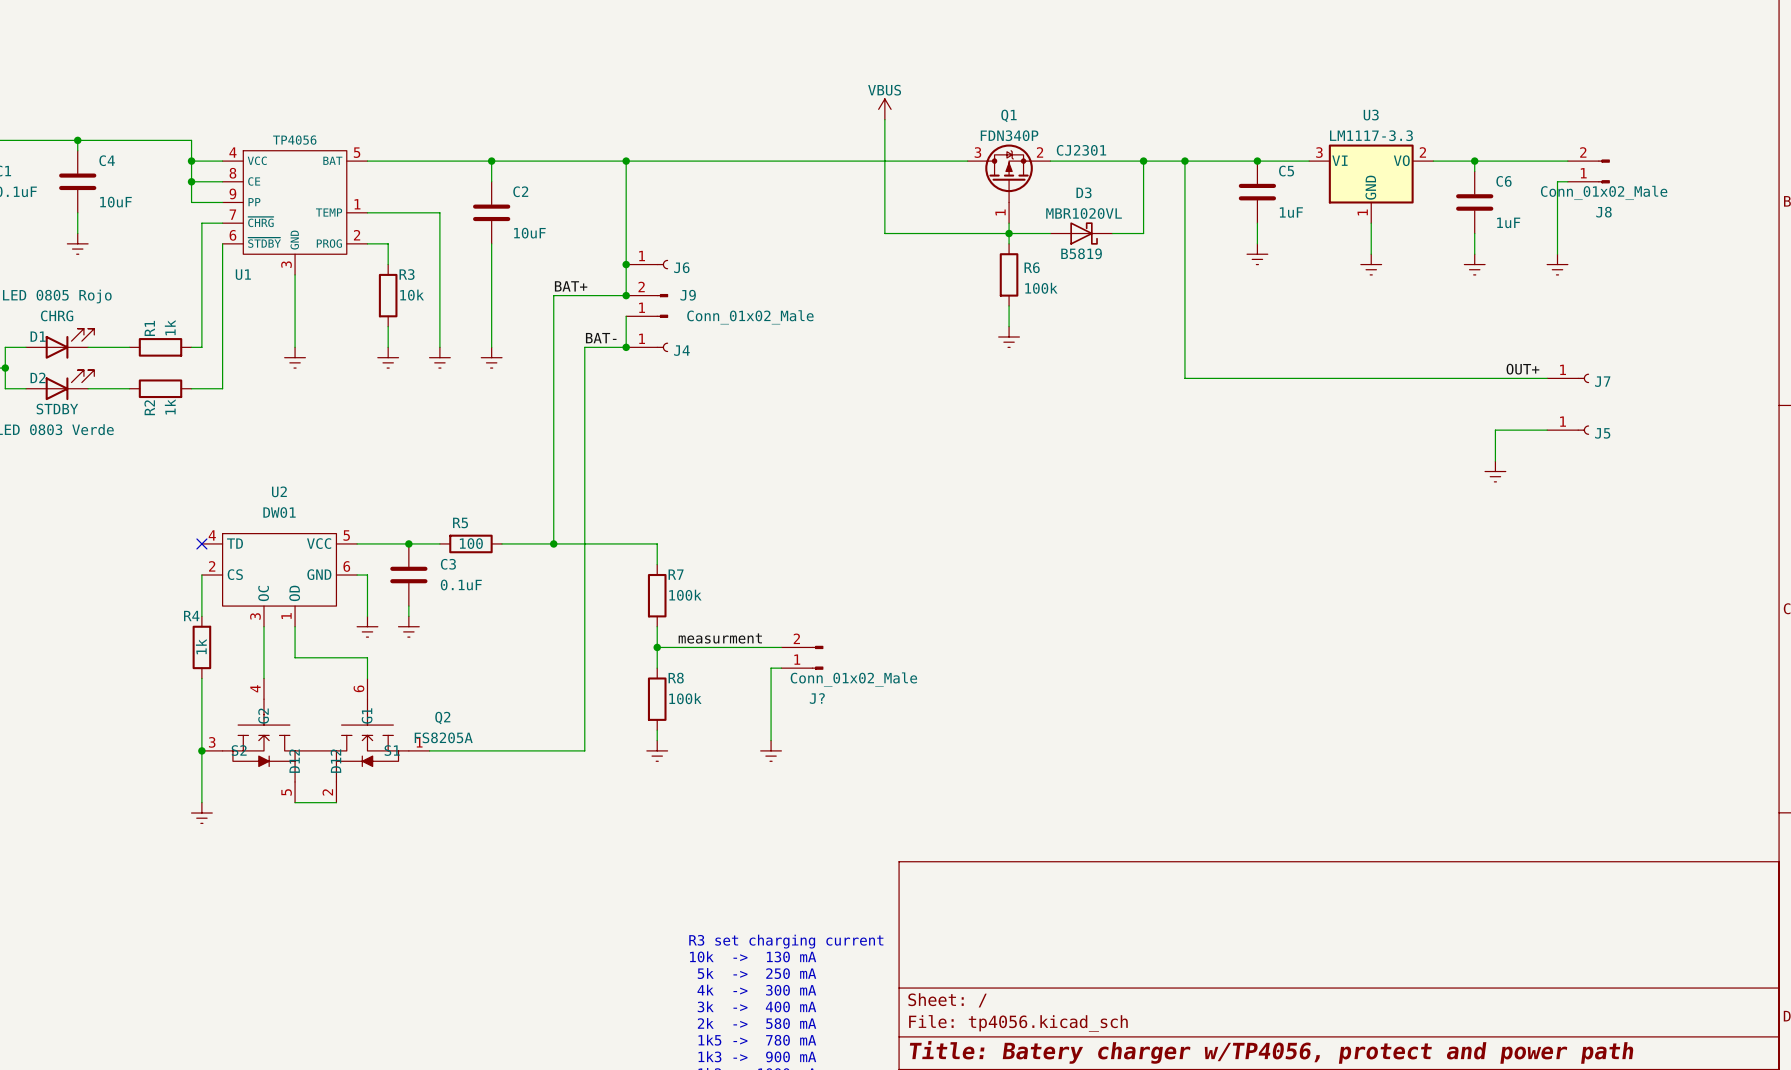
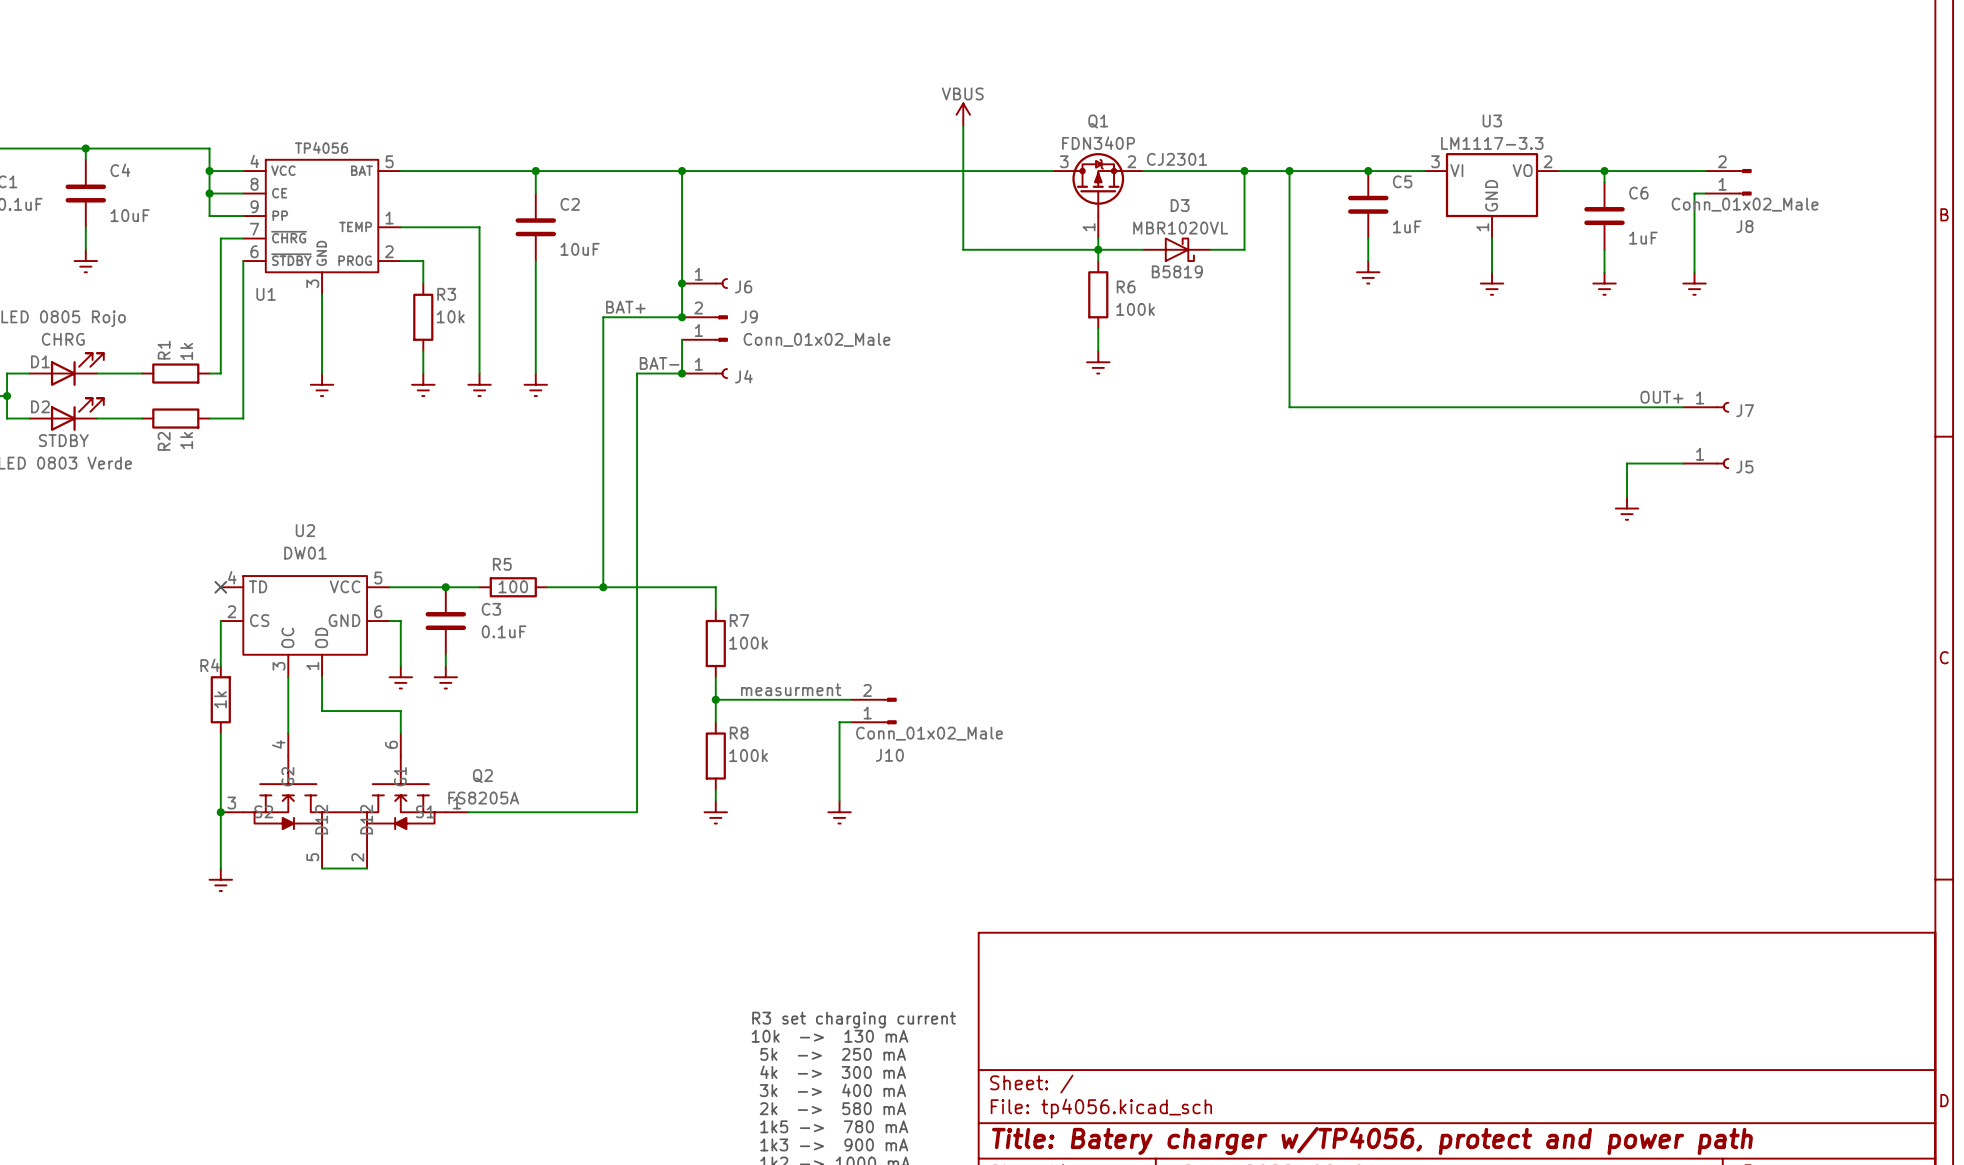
J? name: J? (817, 698) -> J10 (889, 755)

